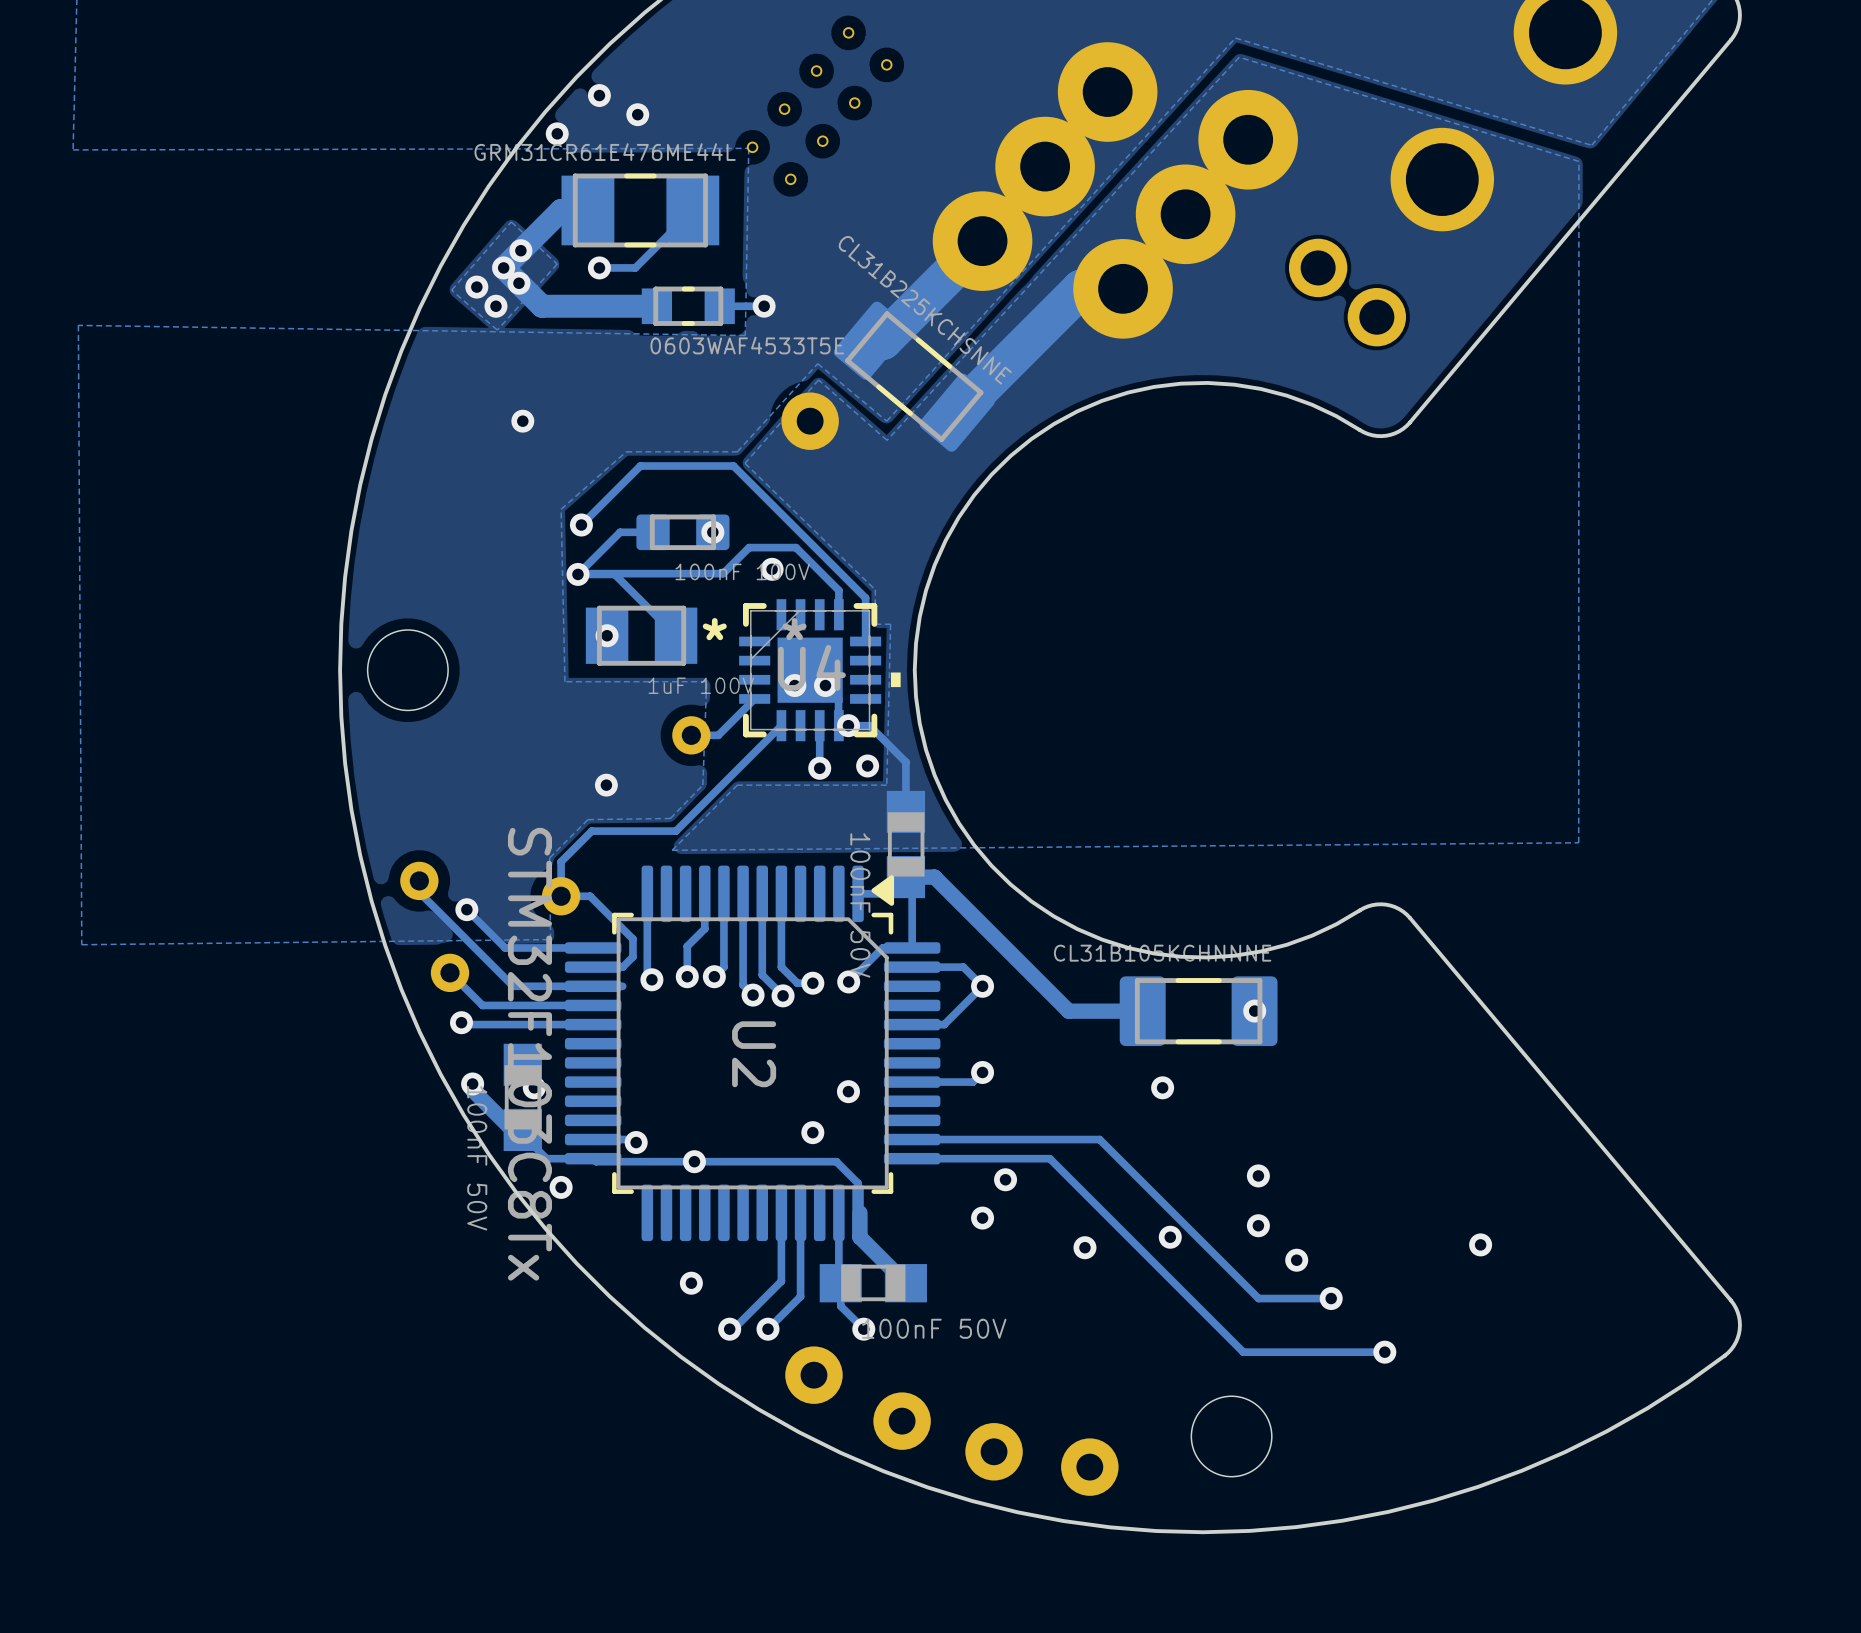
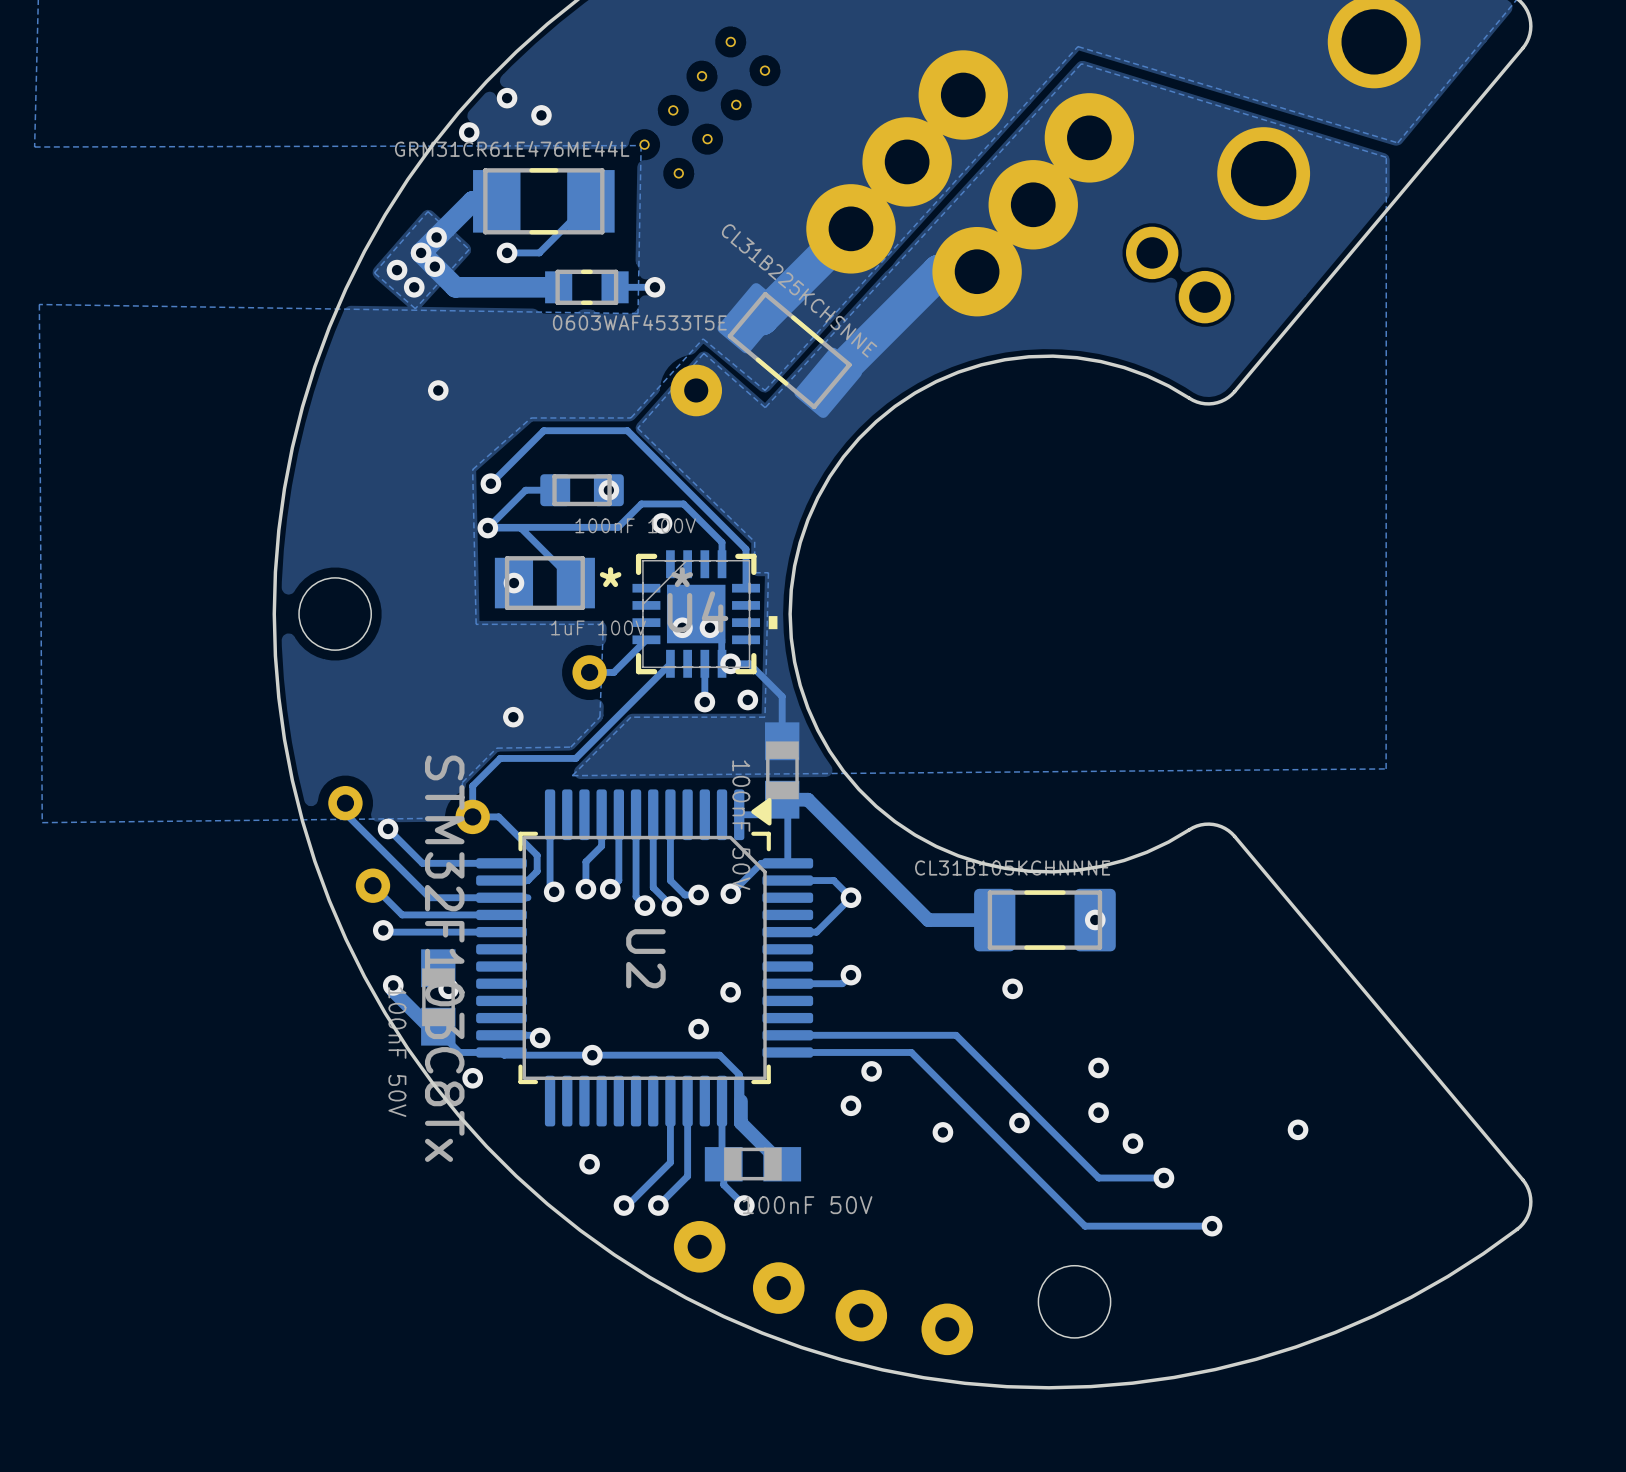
zone outline: (550, 897) (550, 939) (81, 944) (81, 902) -> (462, 818) (42, 822)

